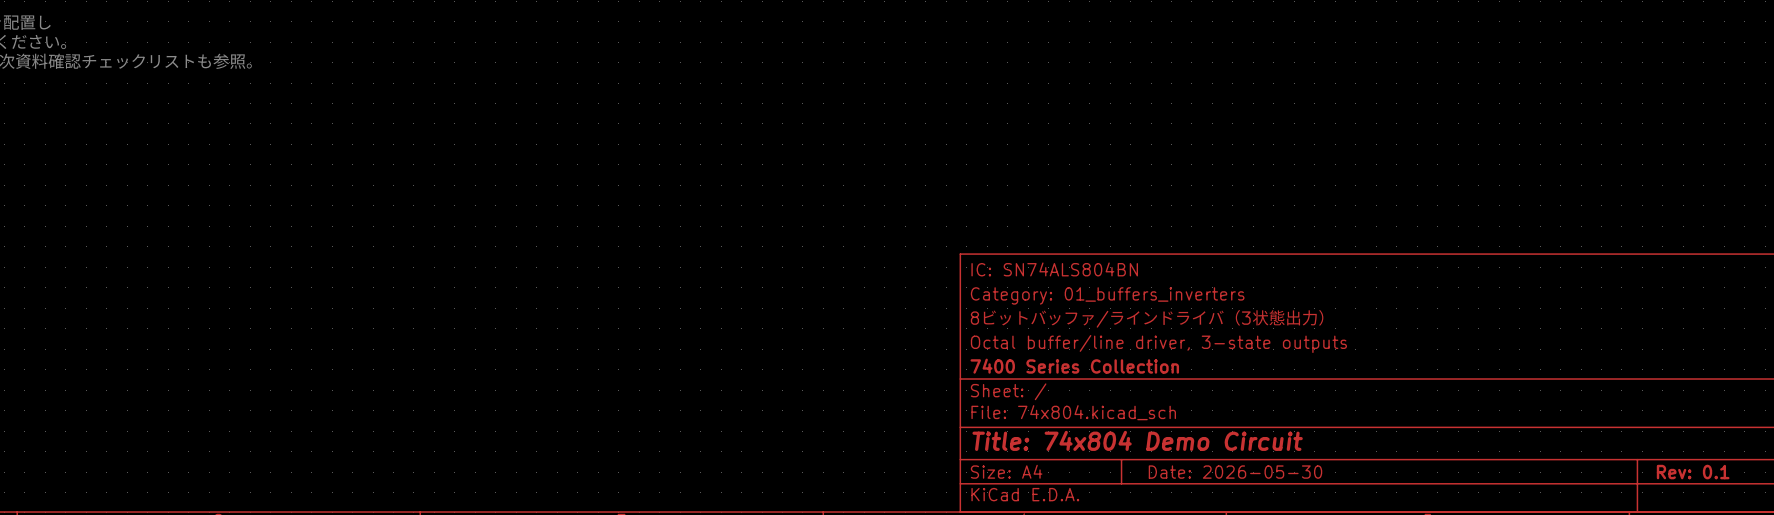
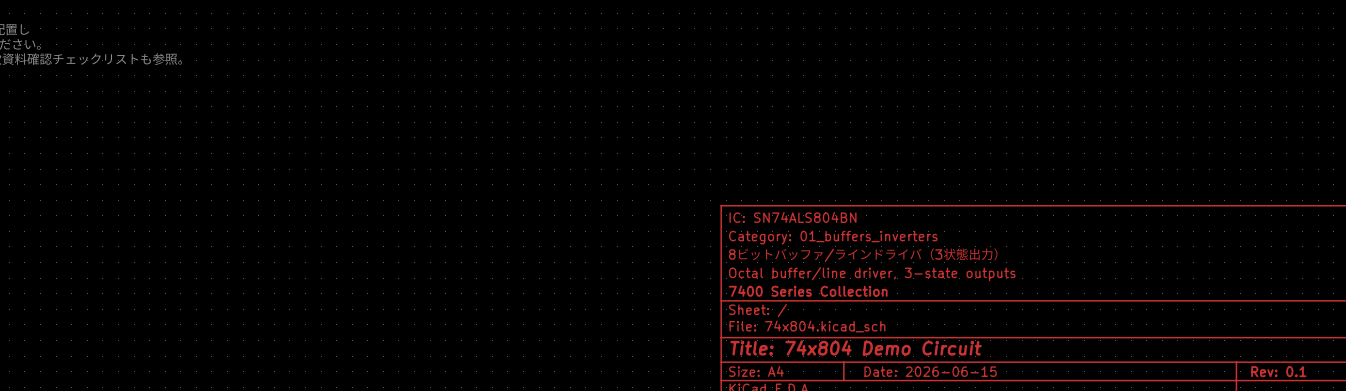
title block: Date: 2026-05-30 (1235, 472) -> Date: 2026-06-15 (930, 371)

